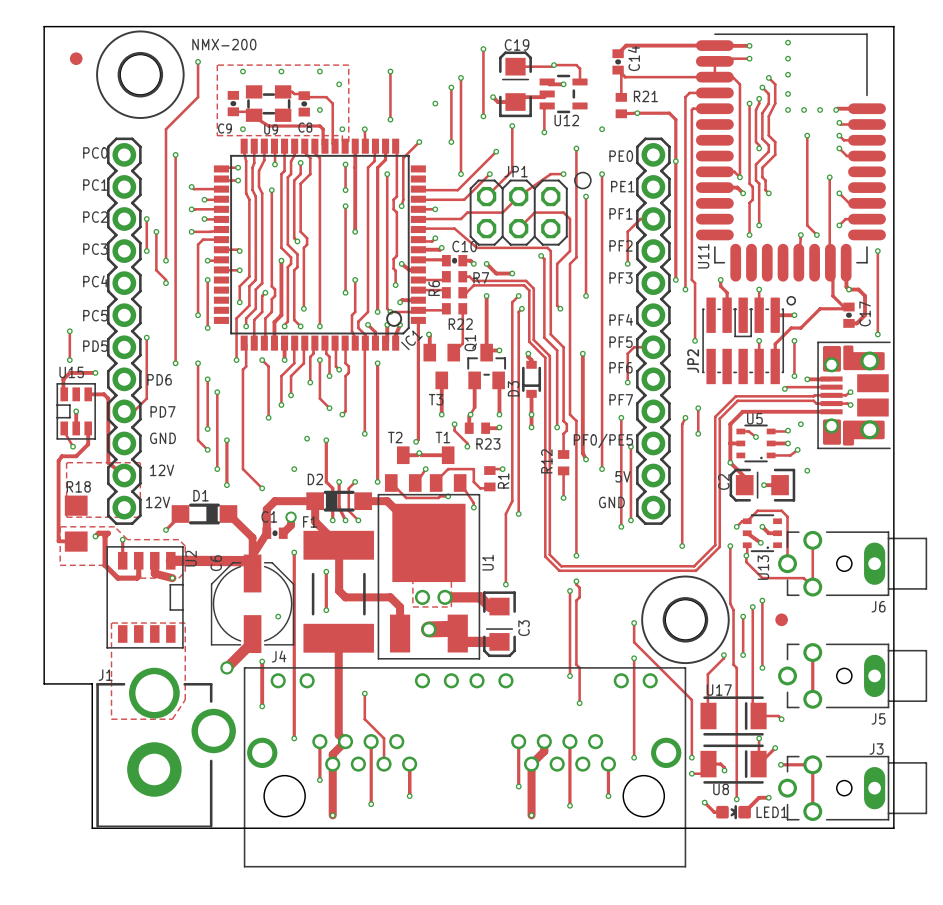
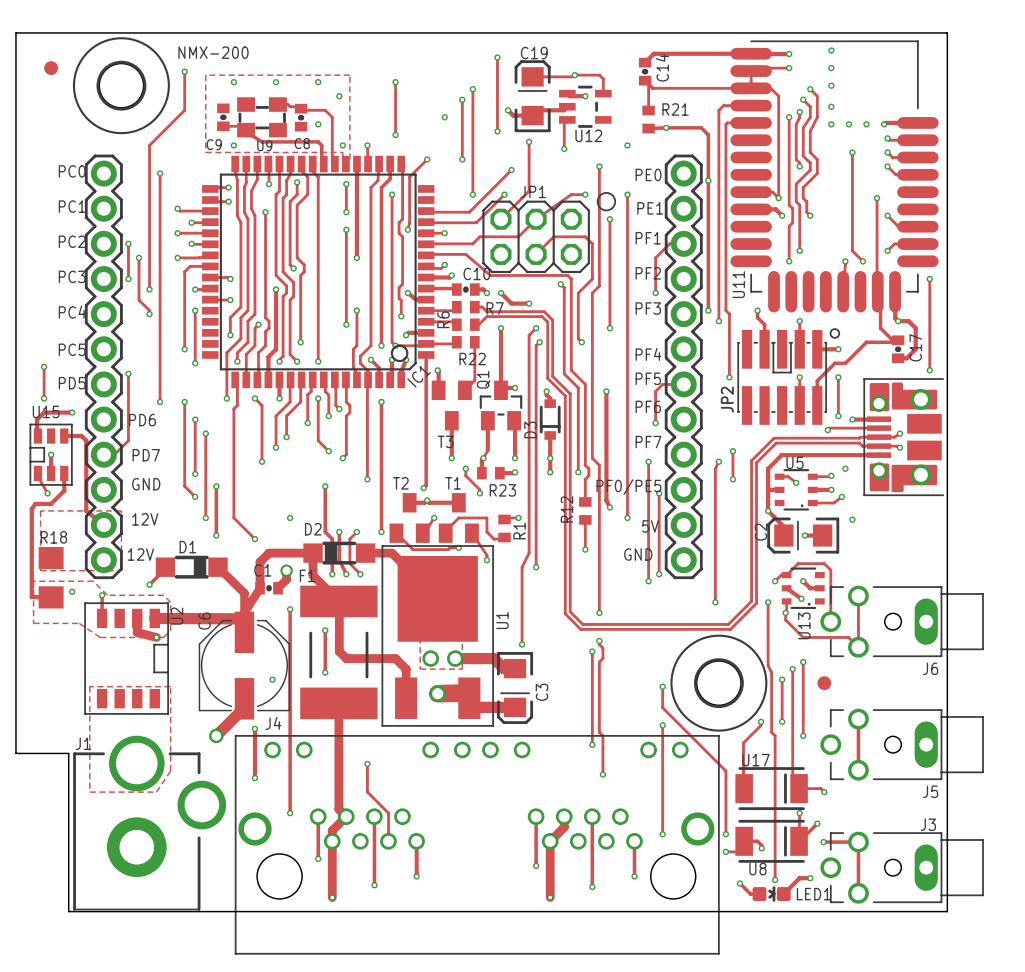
via: (307, 438) -> none
track: (95, 536) (98, 533) (108, 533) (105, 536) (105, 565) (117, 578) (137, 578) (138, 560) -> none

